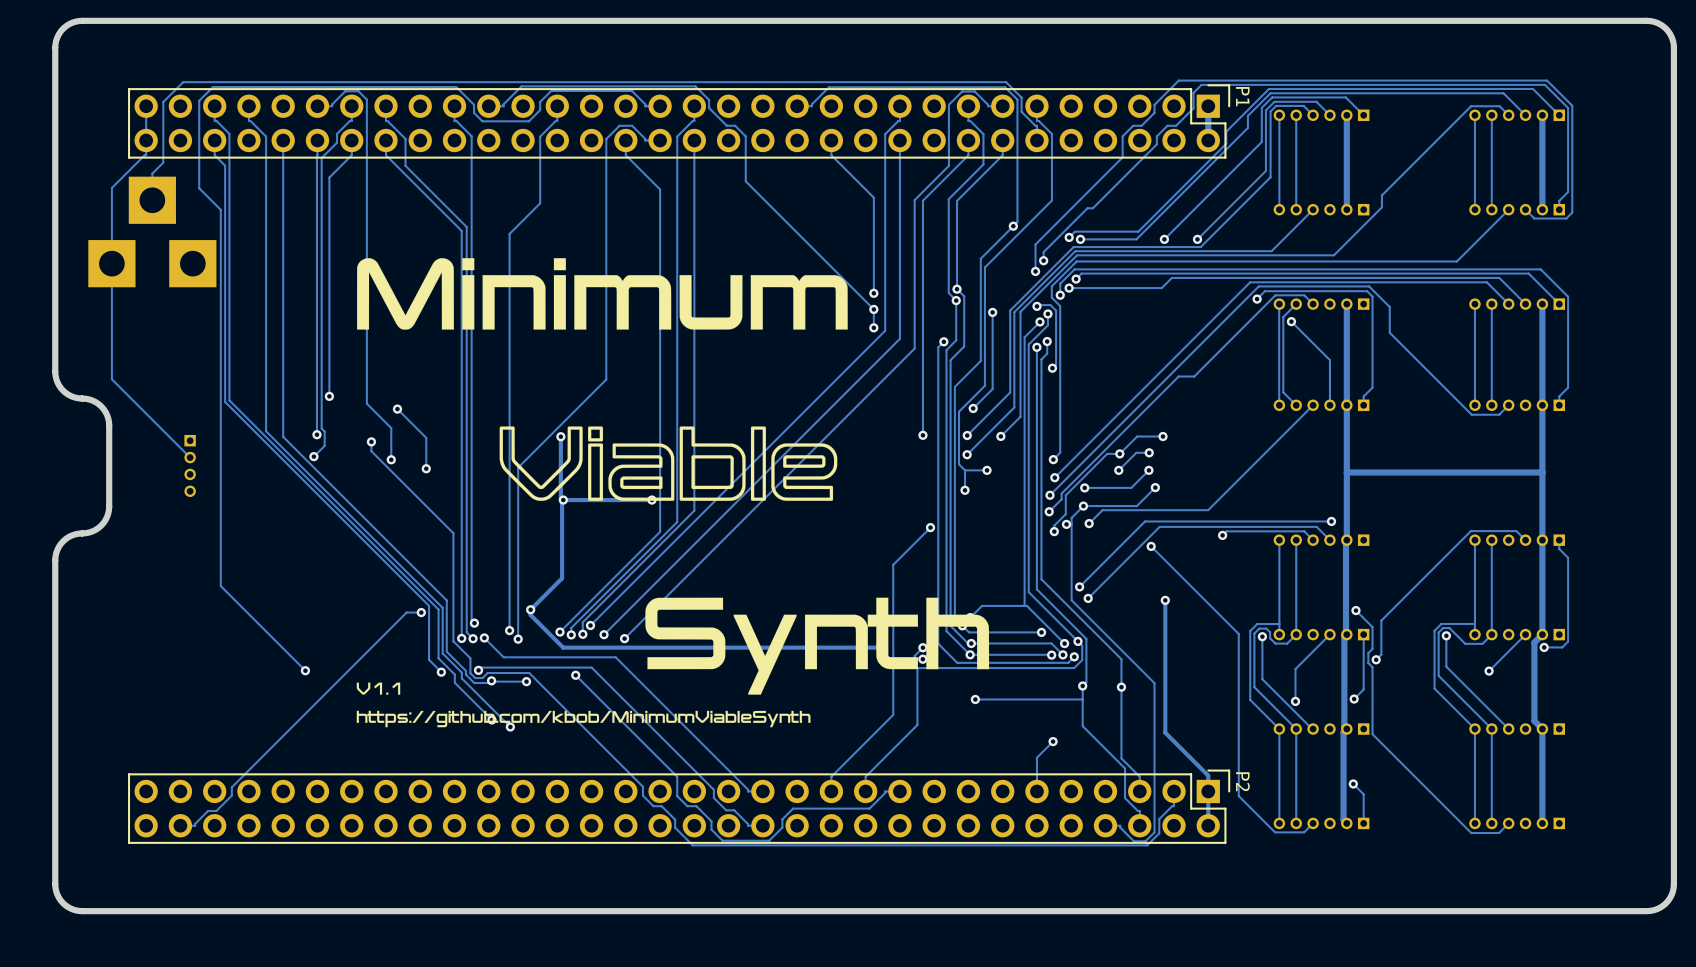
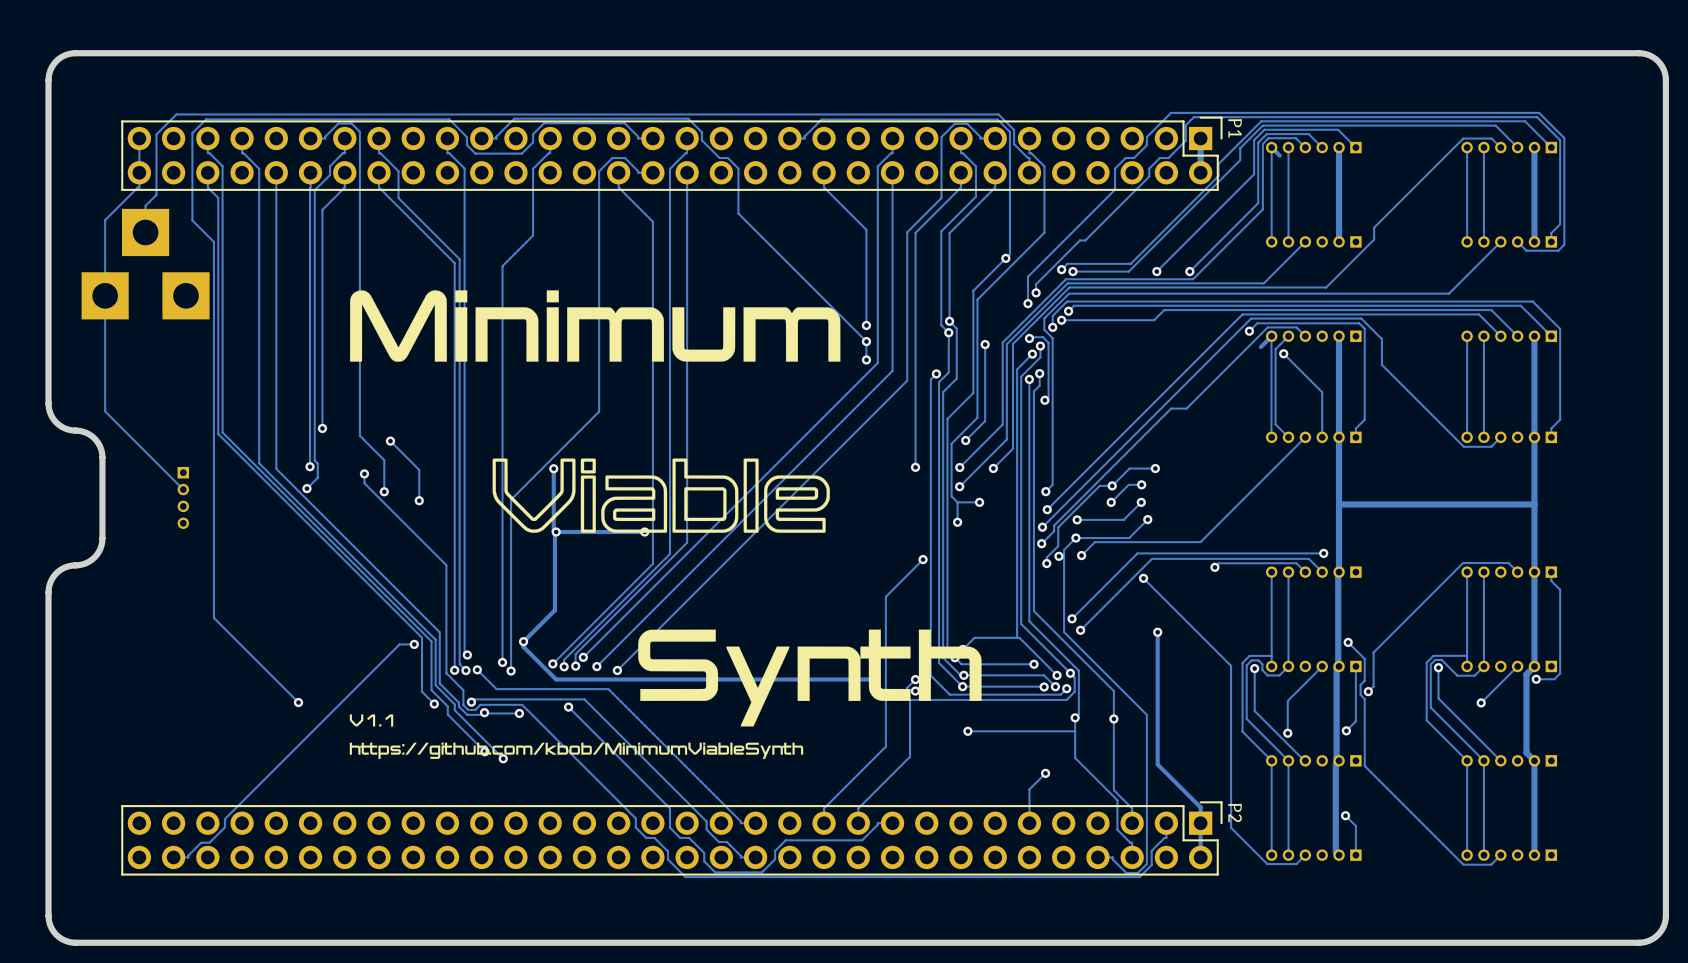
track: none -> (1271, 147) (1279, 155)
track: none -> (1271, 336) (1260, 347)

